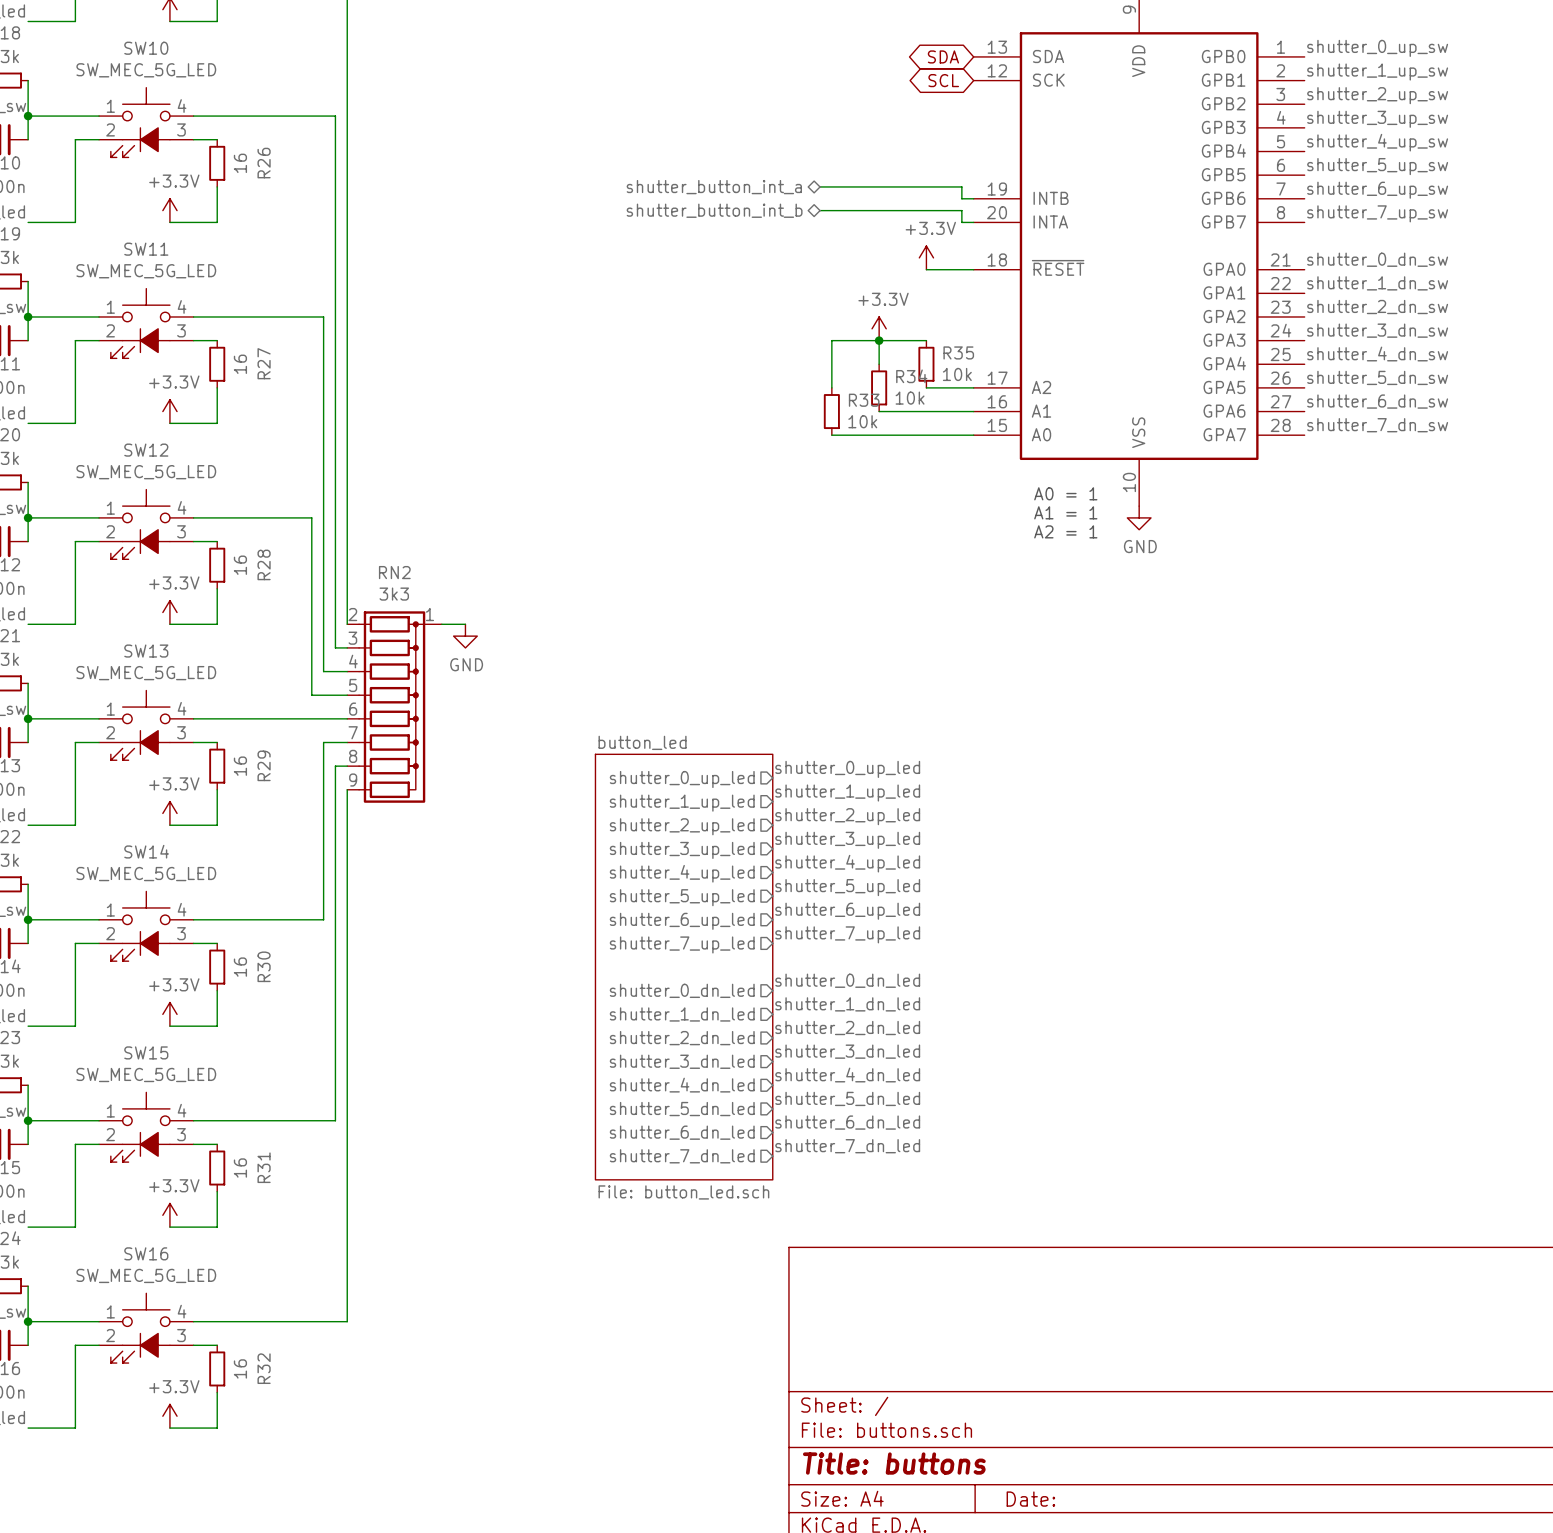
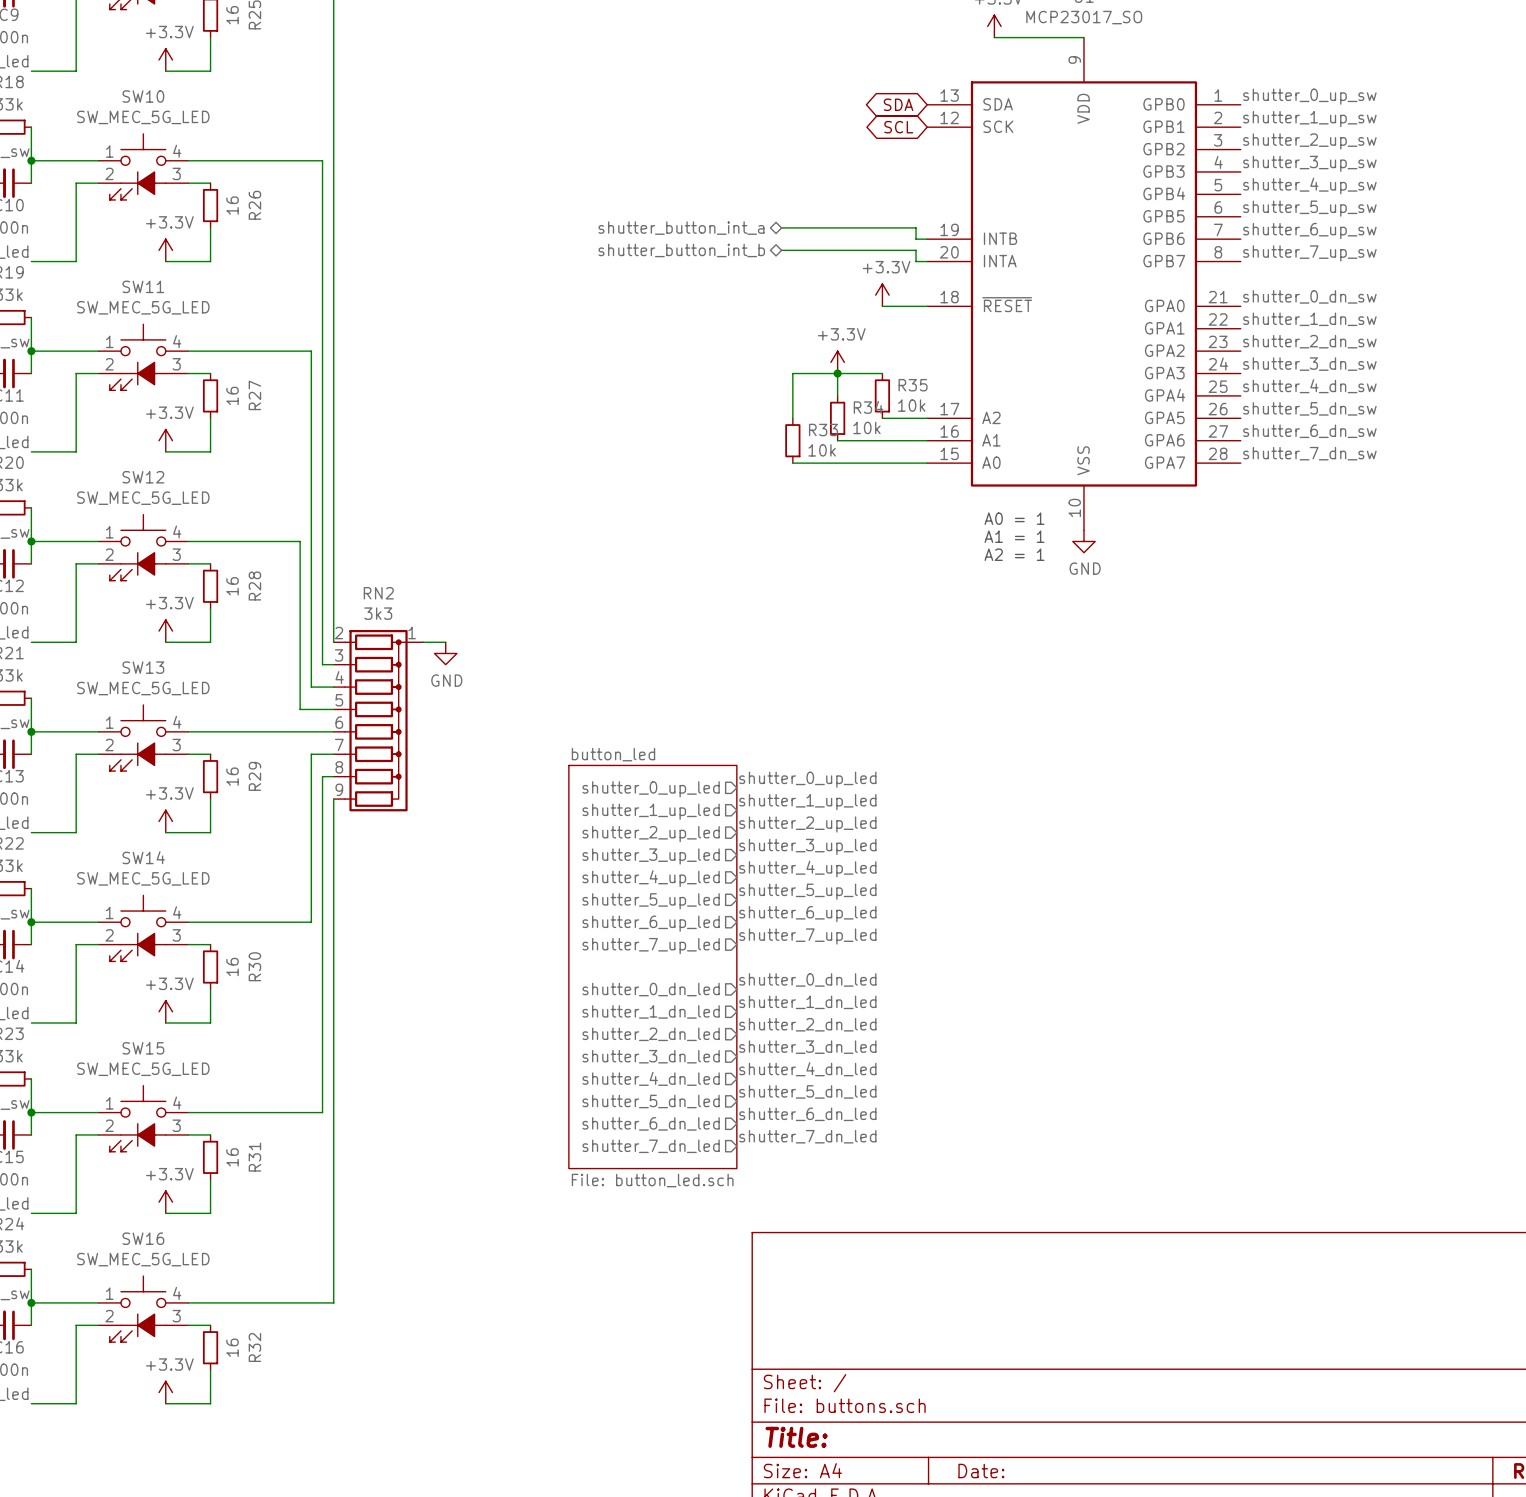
title block: Title: buttons (894, 1463) -> Title: (796, 1437)

